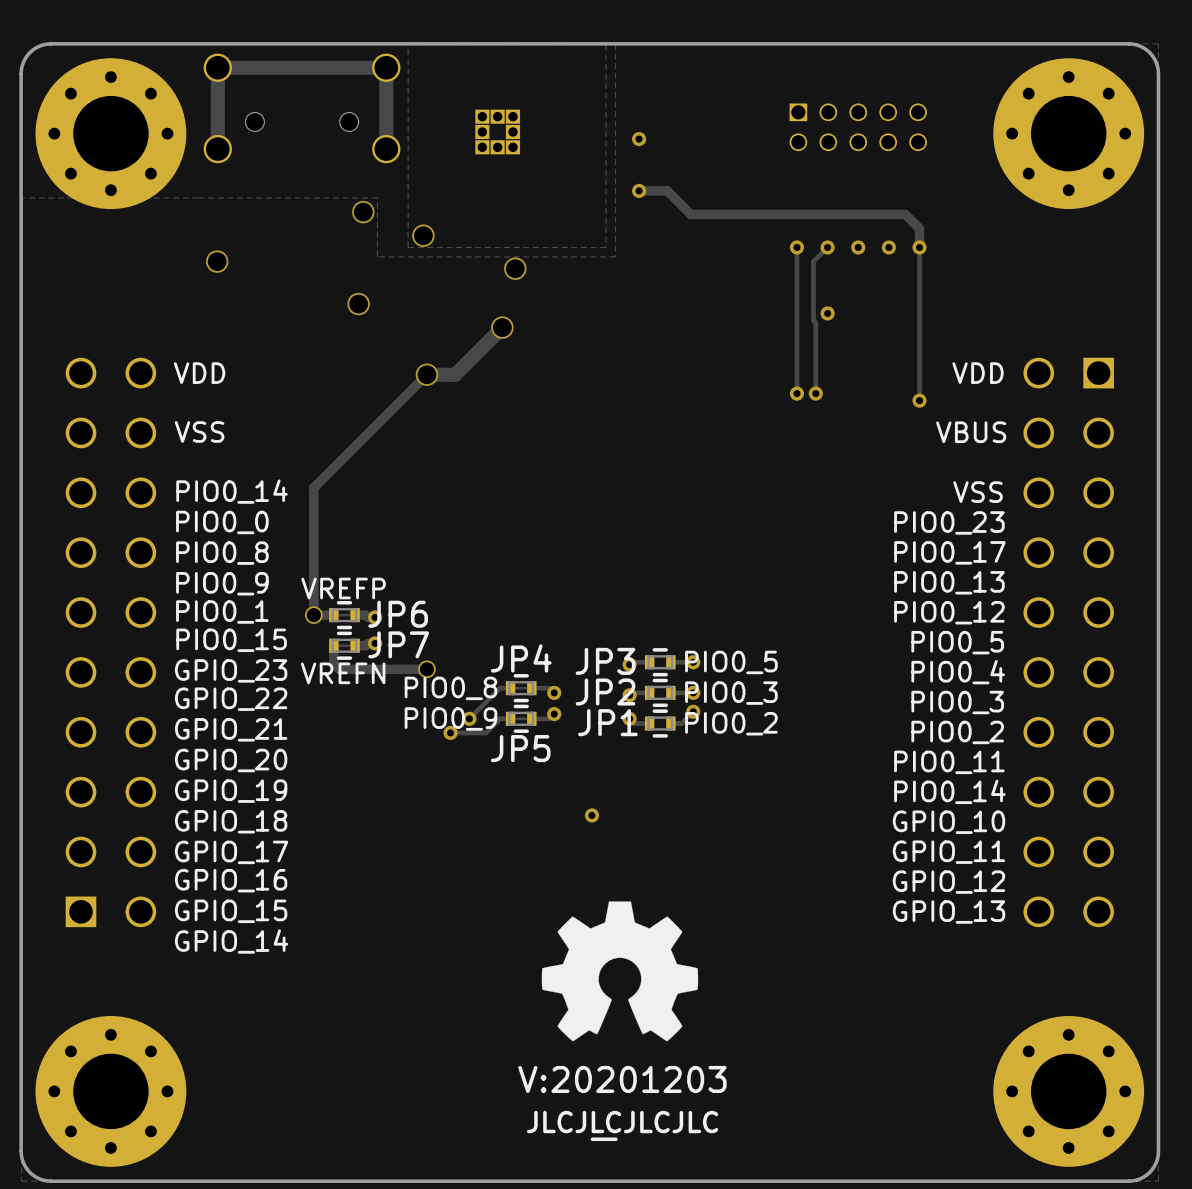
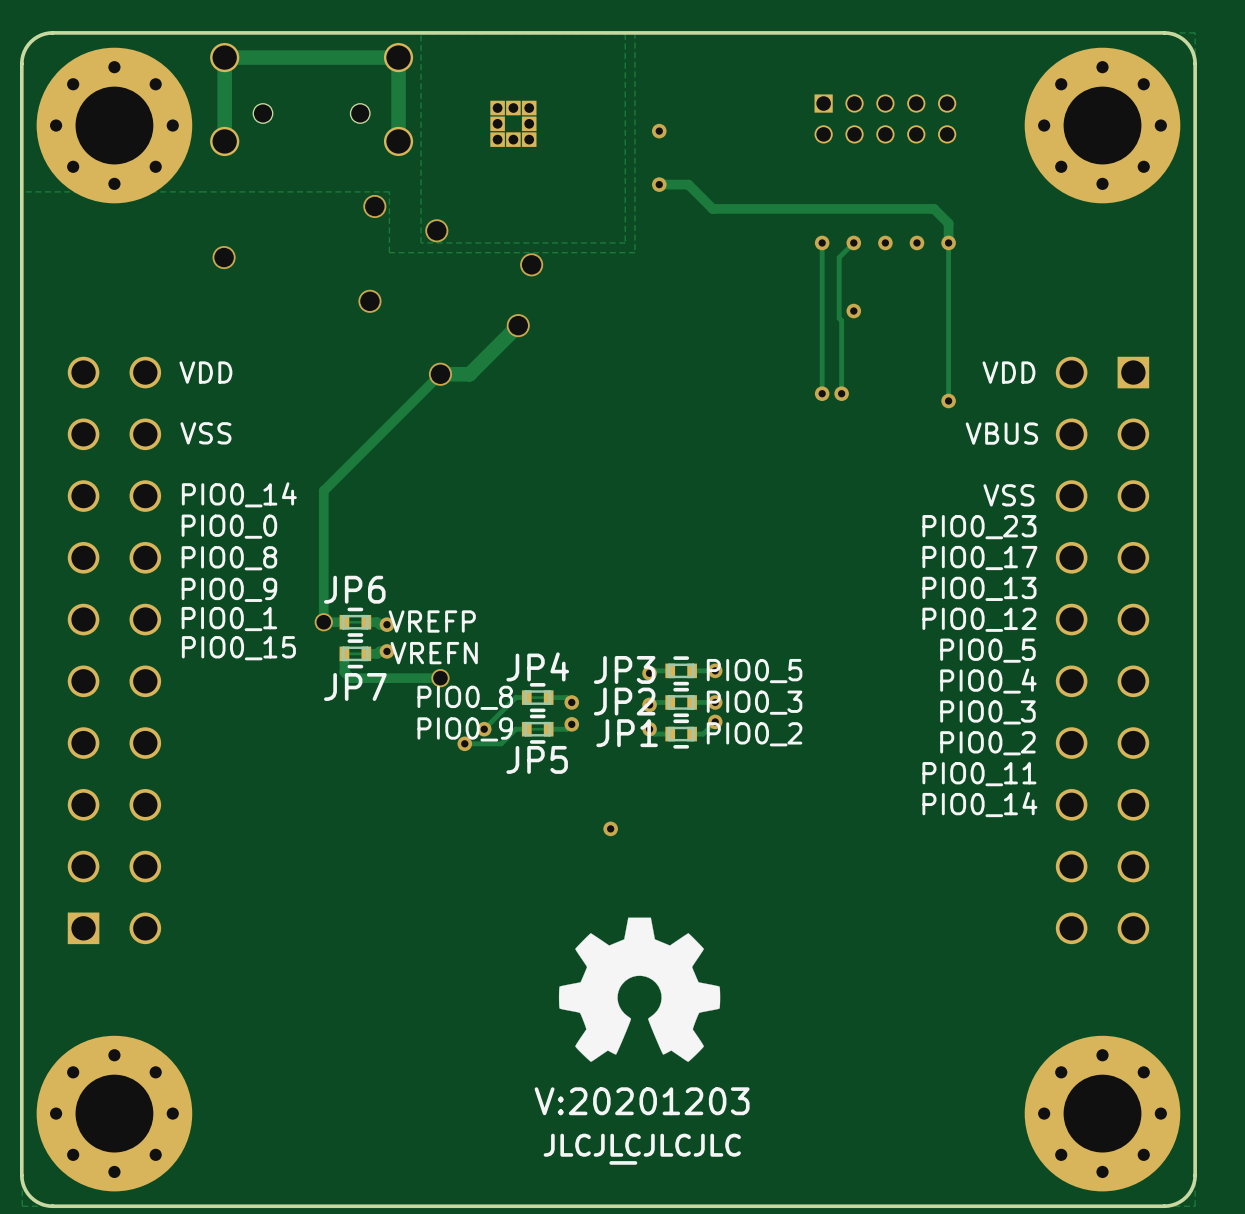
part footprint: [65, 357, 157, 928] -> [67, 356, 162, 945]
JP6 value position: VREFP (343, 588) -> VREFP (432, 621)
JP6 name position: JP6 (398, 614) -> JP6 (354, 589)
JP7 name position: JP7 (398, 644) -> JP7 (355, 686)
JP7 value position: VREFN (343, 673) -> VREFN (434, 653)
part text: GPIO_10 (948, 822) -> none
part text: GPIO_11 (948, 852) -> none
part text: GPIO_12 (948, 882) -> none
part text: GPIO_13 (948, 912) -> none

